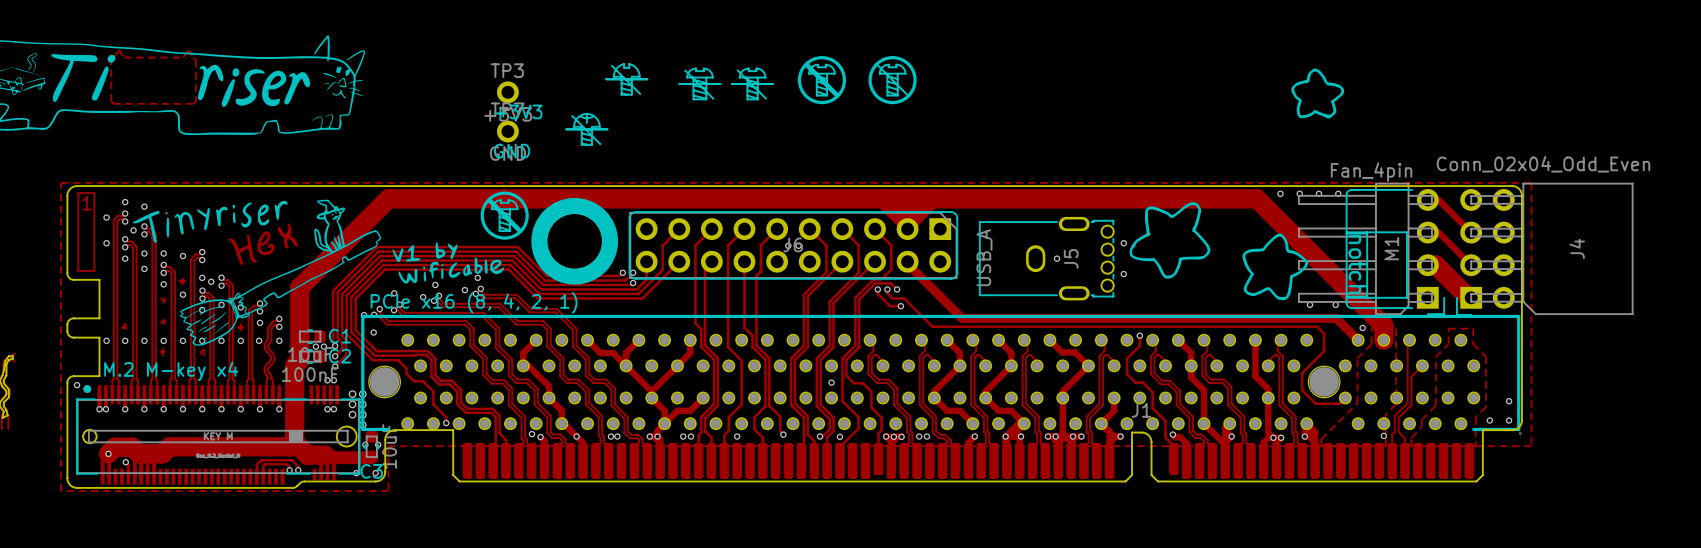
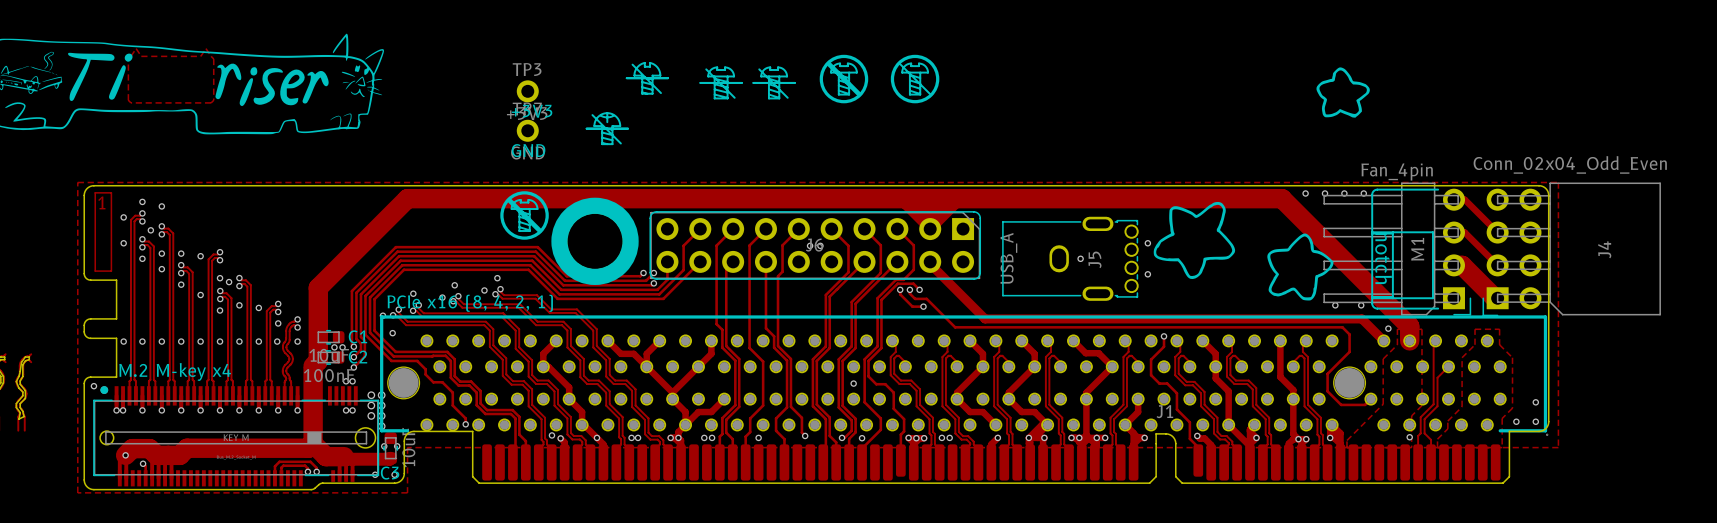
drawing: [121, 199, 505, 357] -> none

